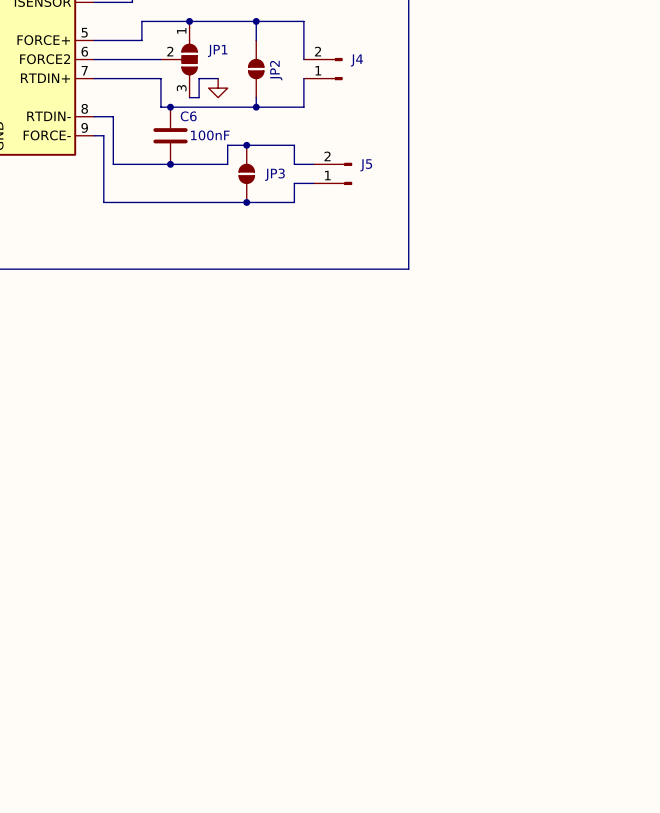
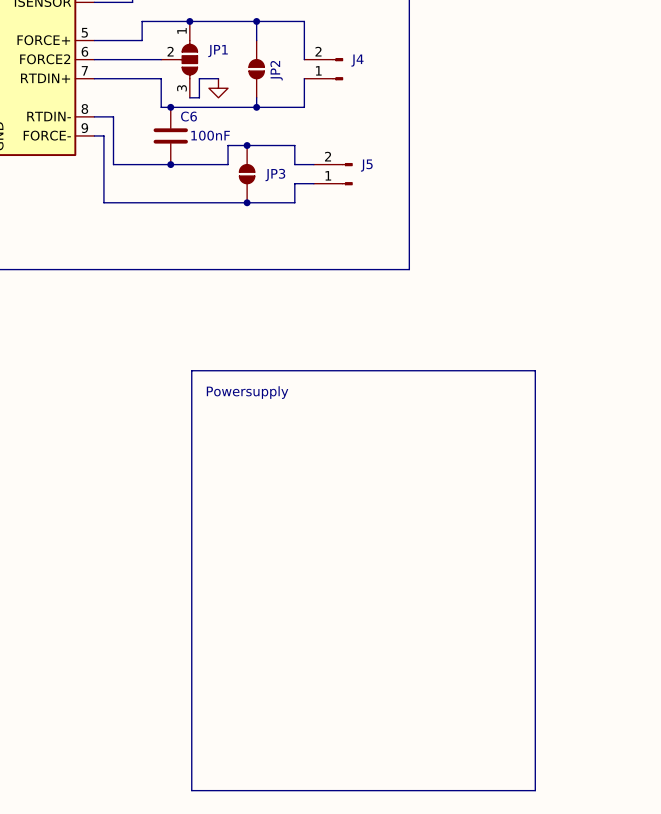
line: none -> (191, 370) (535, 370) (535, 790) (191, 790) (191, 370)
text: none -> Powersupply (247, 392)

